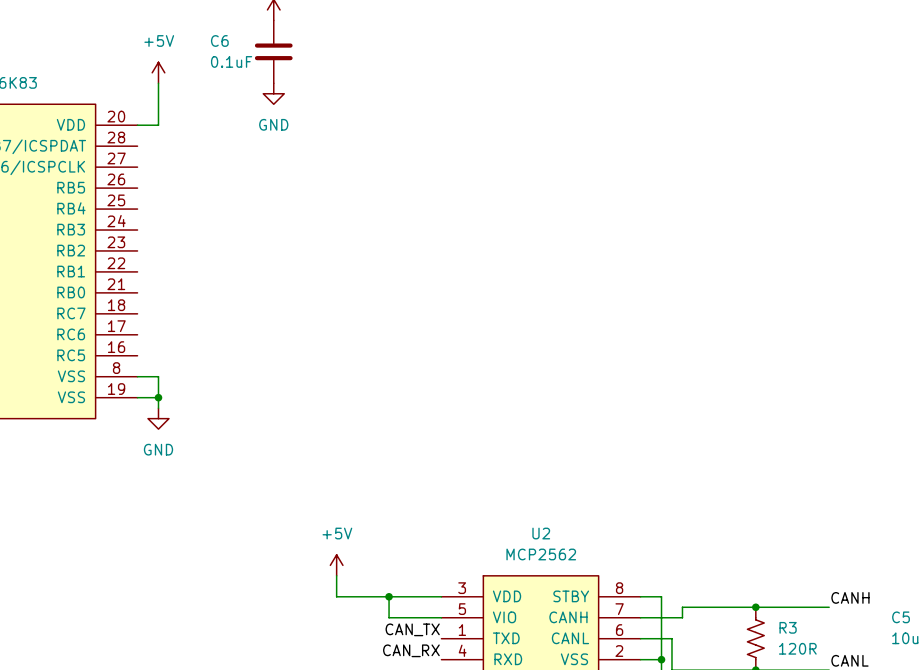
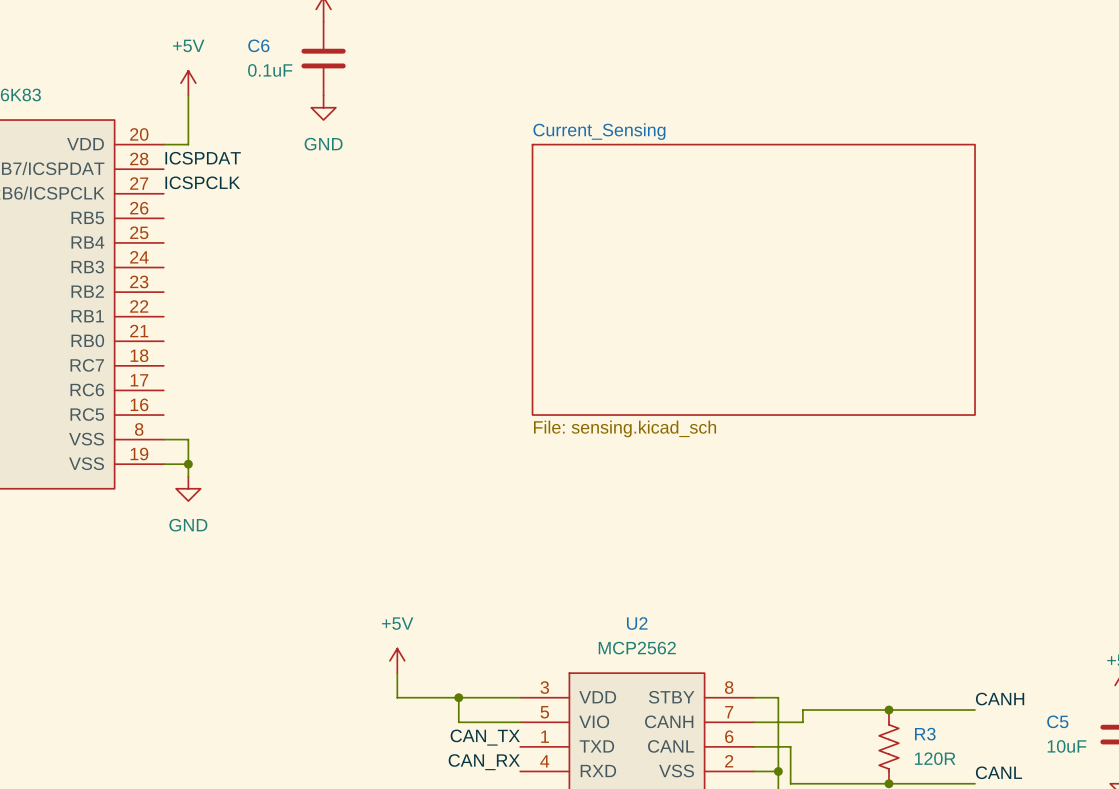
label: none -> ICSPDAT (203, 158)
label: none -> ICSPCLK (202, 182)
sheet Current_Sensing: none -> File: sensing.kicad_sch (753, 279)

